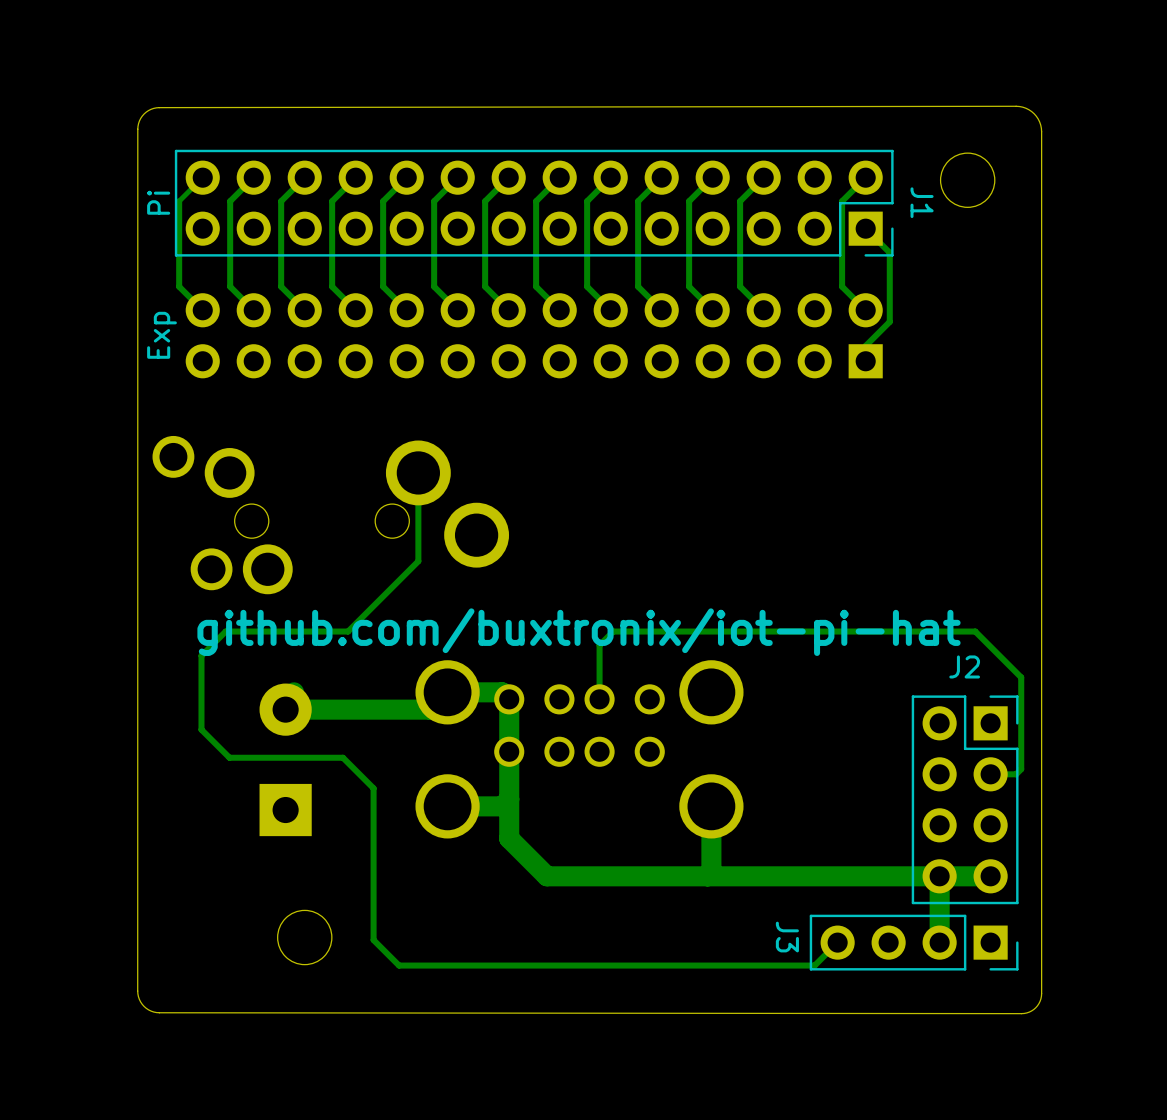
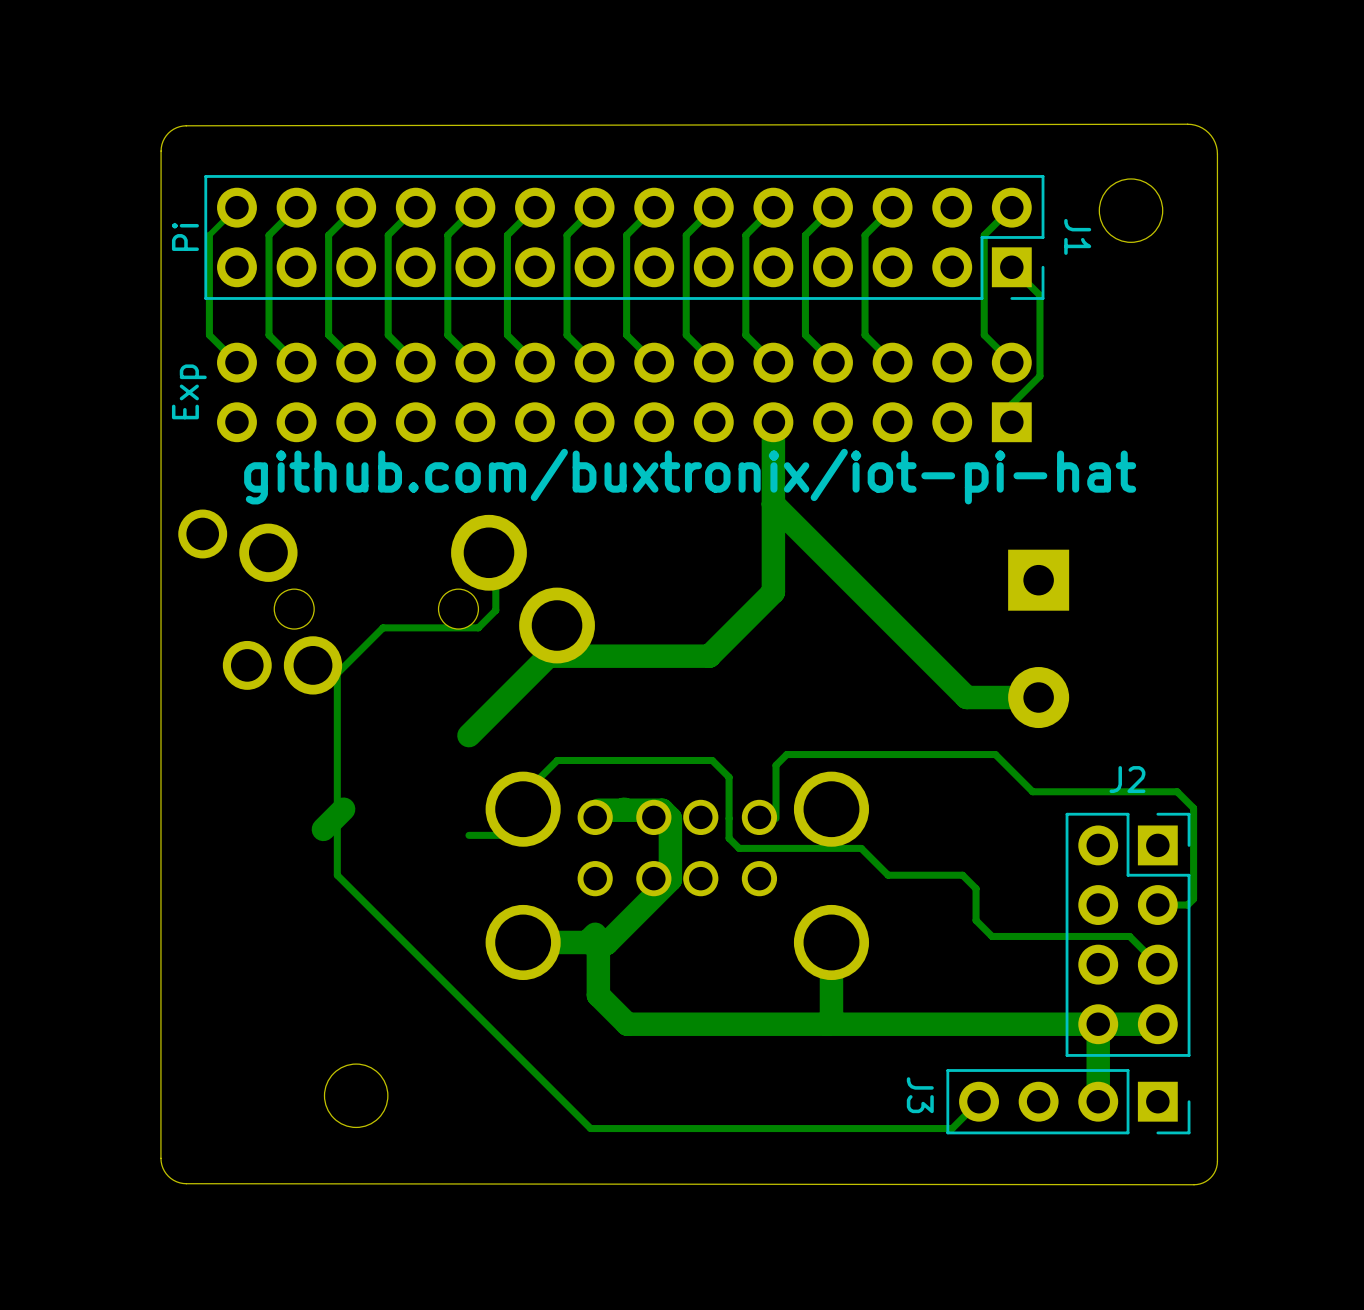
track: none -> (773, 462) (773, 422) (773, 592) (709, 656) (548, 656) (468, 735)
track: none -> (773, 504) (966, 697) (1038, 697)
track: (418, 472) (418, 561) (348, 631) (225, 631) (201, 655) (201, 729) (229, 757) (342, 757) (373, 788) (373, 940) (399, 965) (505, 965) -> (495, 528) (495, 610) (478, 627) (383, 627) (337, 673) (337, 875) (590, 1128)
part: none -> (1038, 638)
text position: github.com/buxtronix/iot-pi-hat (579, 632) -> github.com/buxtronix/iot-pi-hat (690, 476)
track: (1021, 691) (1021, 677) (975, 631) (613, 631) (599, 645) (599, 699) -> (1193, 808) (1177, 791) (1032, 791) (995, 754) (786, 754) (776, 765) (776, 818)
track: (285, 709) (430, 709) (447, 692) (502, 692) (509, 699) (509, 838) (546, 876) -> (598, 810) (662, 810) (670, 818) (670, 879) (606, 943) (598, 943) (598, 995) (627, 1024) (639, 1024)
track: none -> (468, 835) (521, 835) (534, 821) (534, 782) (557, 760) (712, 760) (729, 777) (729, 838) (739, 848) (861, 848) (888, 875) (962, 875) (976, 888) (976, 920) (992, 936) (1129, 936) (1157, 964)
part: (285, 759) -> none

